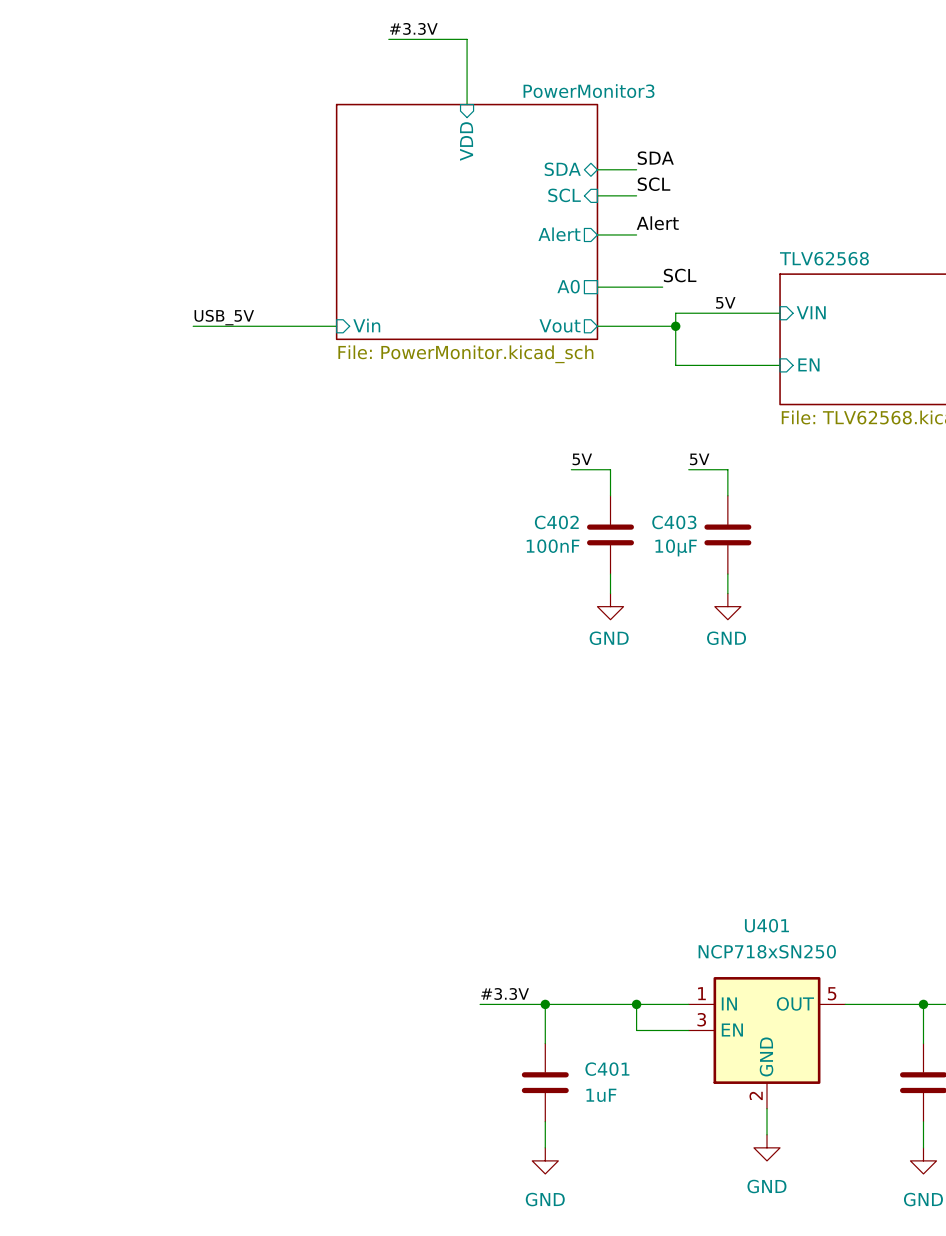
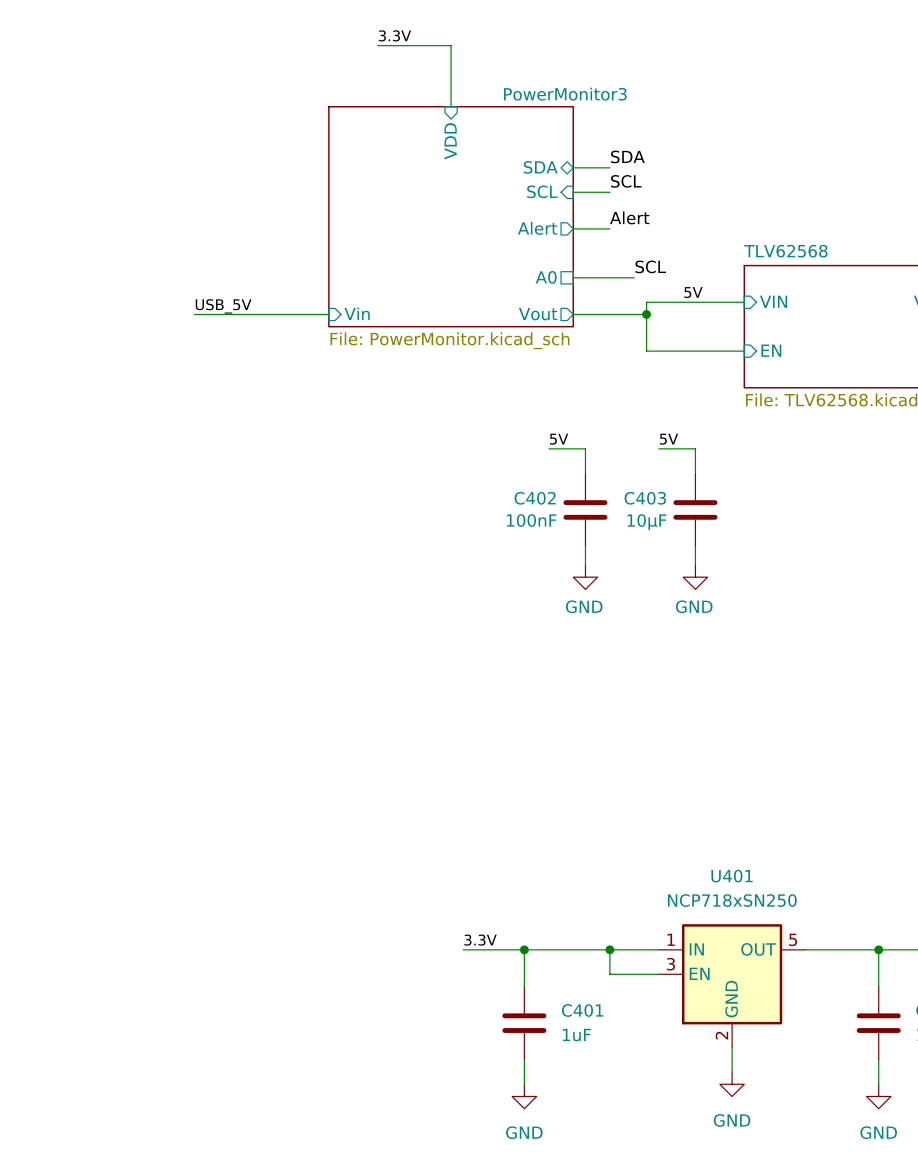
label: #3.3V (413, 28) -> 3.3V (395, 35)
label: #3.3V (505, 993) -> 3.3V (480, 940)

